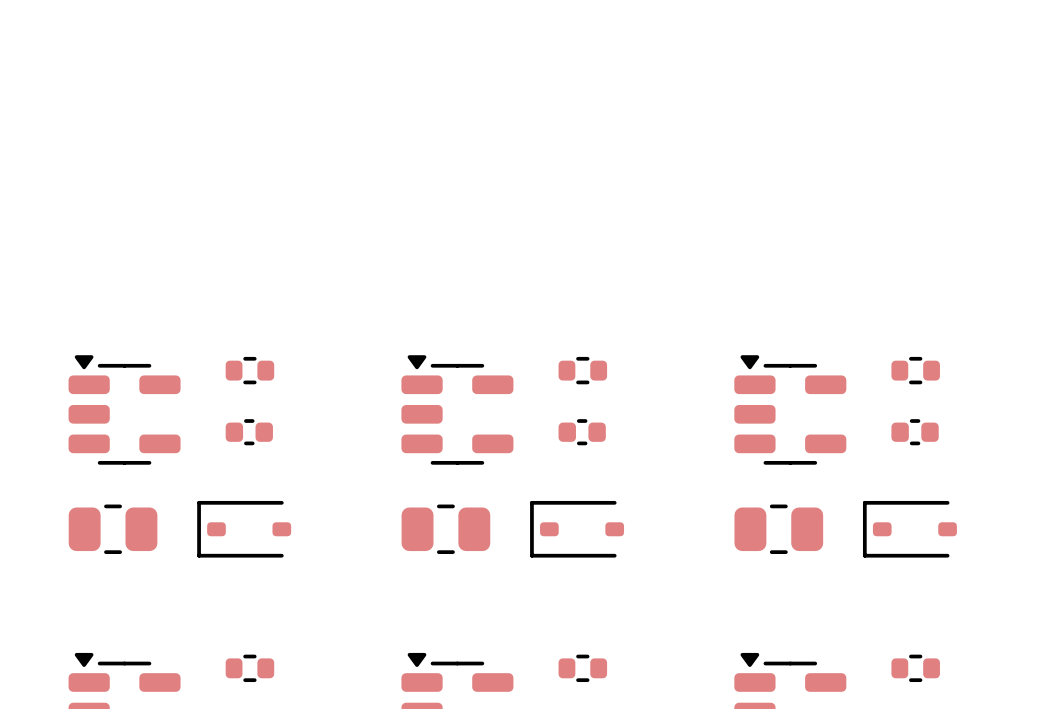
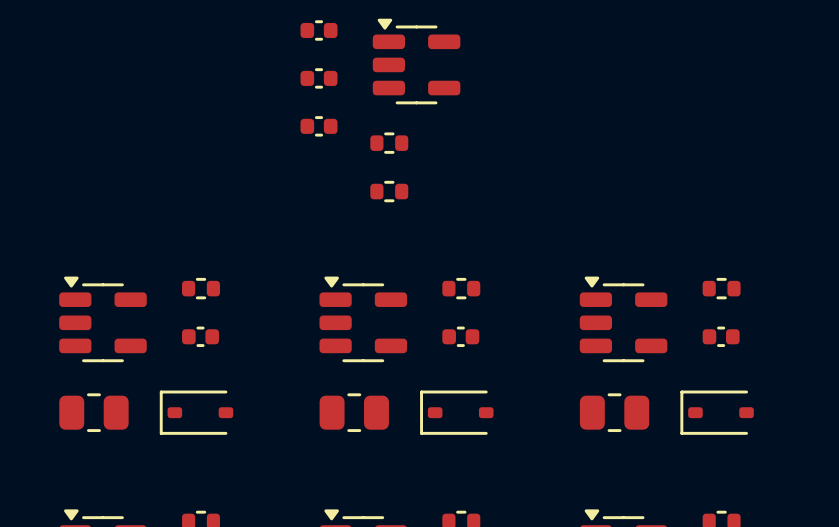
part: none -> (319, 30)
part: none -> (416, 61)
part: none -> (319, 78)
part: none -> (319, 126)
part: none -> (389, 143)
part: none -> (389, 191)

